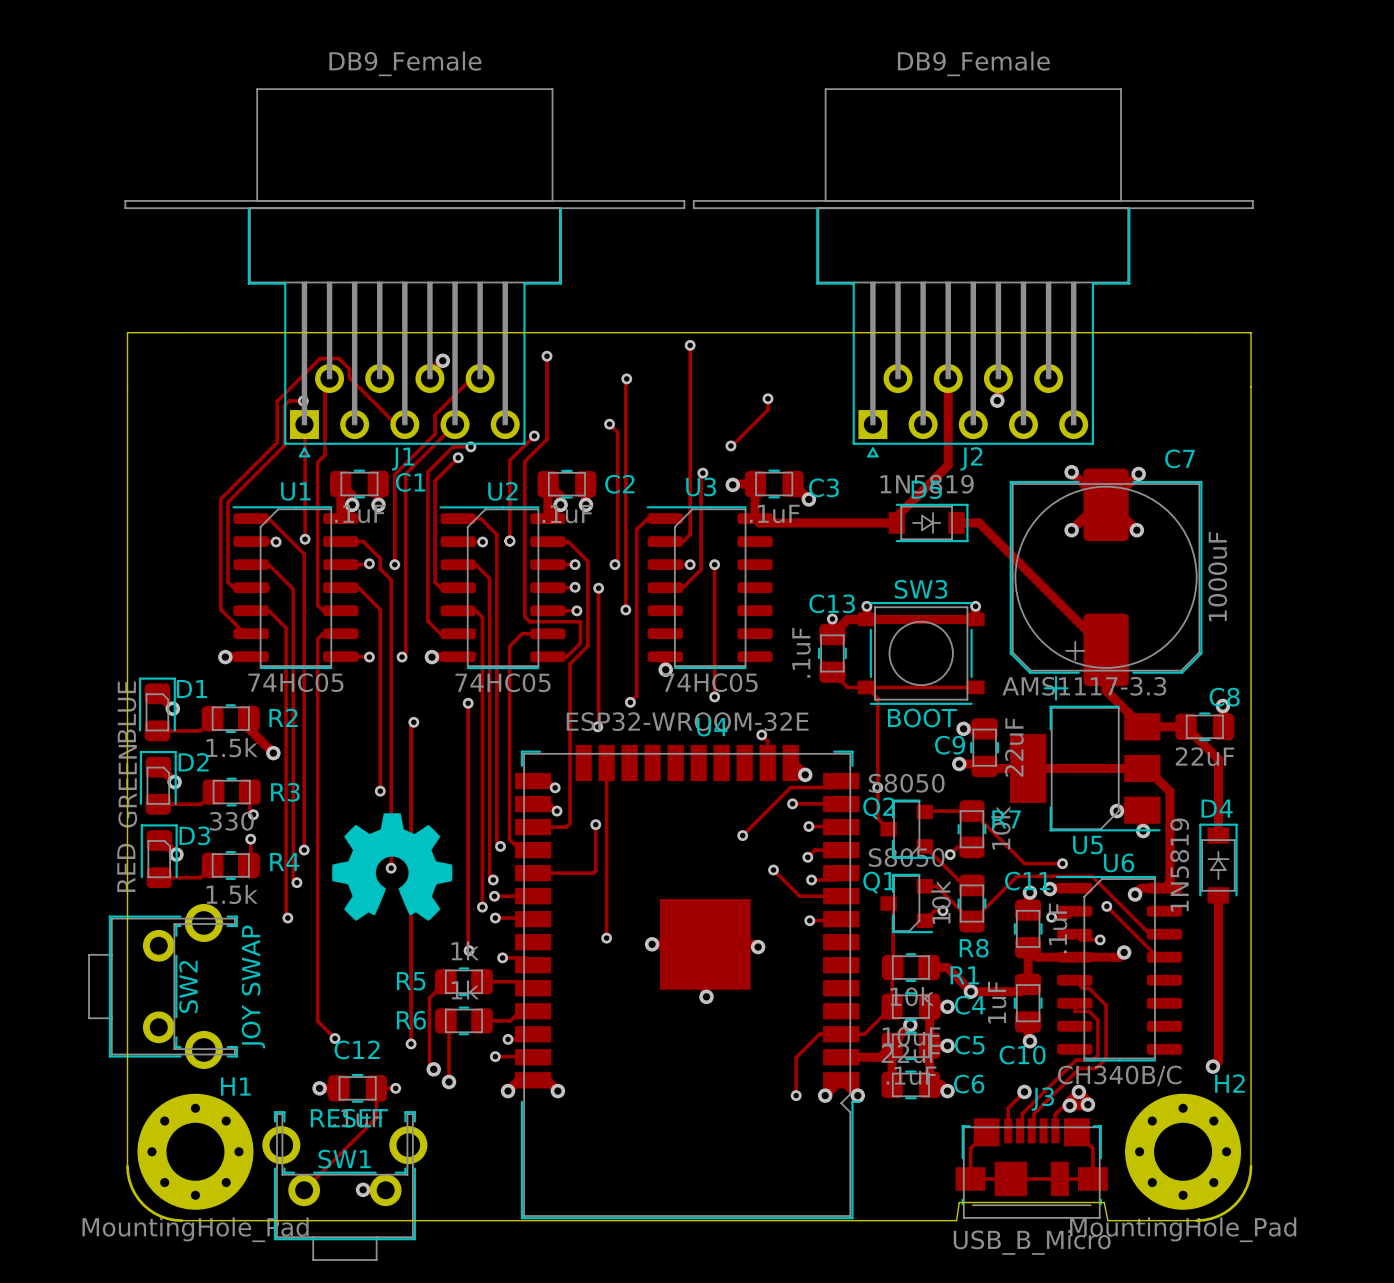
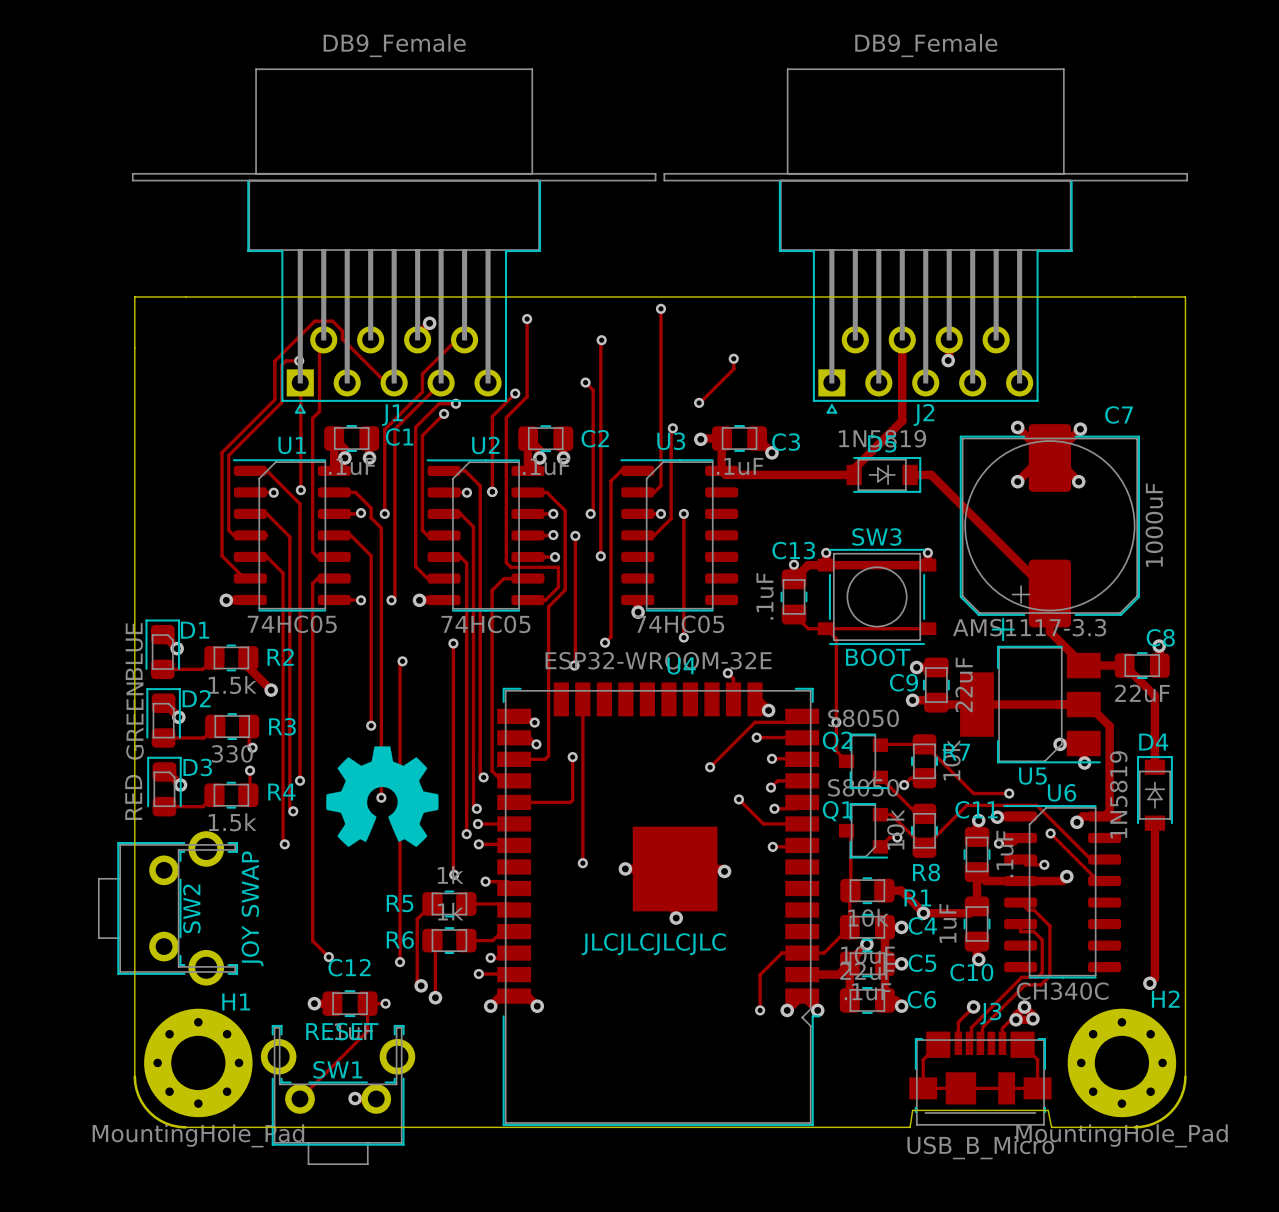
text: none -> JLCJLCJLCJLC (653, 944)
U6 value: CH340B/C (1119, 1075) -> CH340C (1062, 991)

